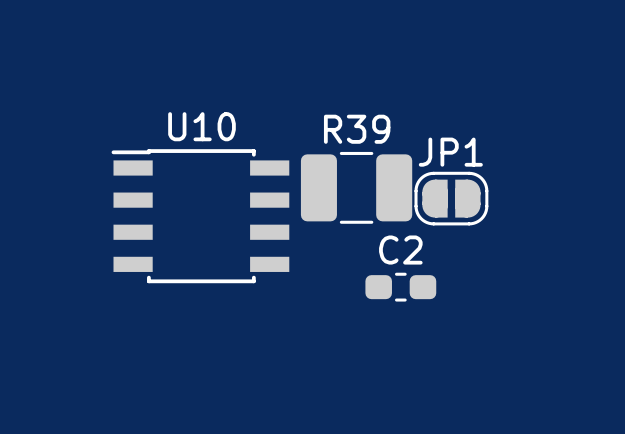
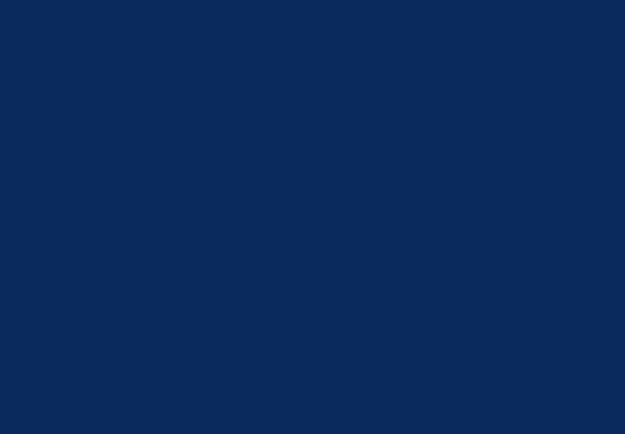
R39: (356, 187) -> none
JP1: (451, 198) -> none
U10: (200, 216) -> none
C2: (400, 287) -> none

